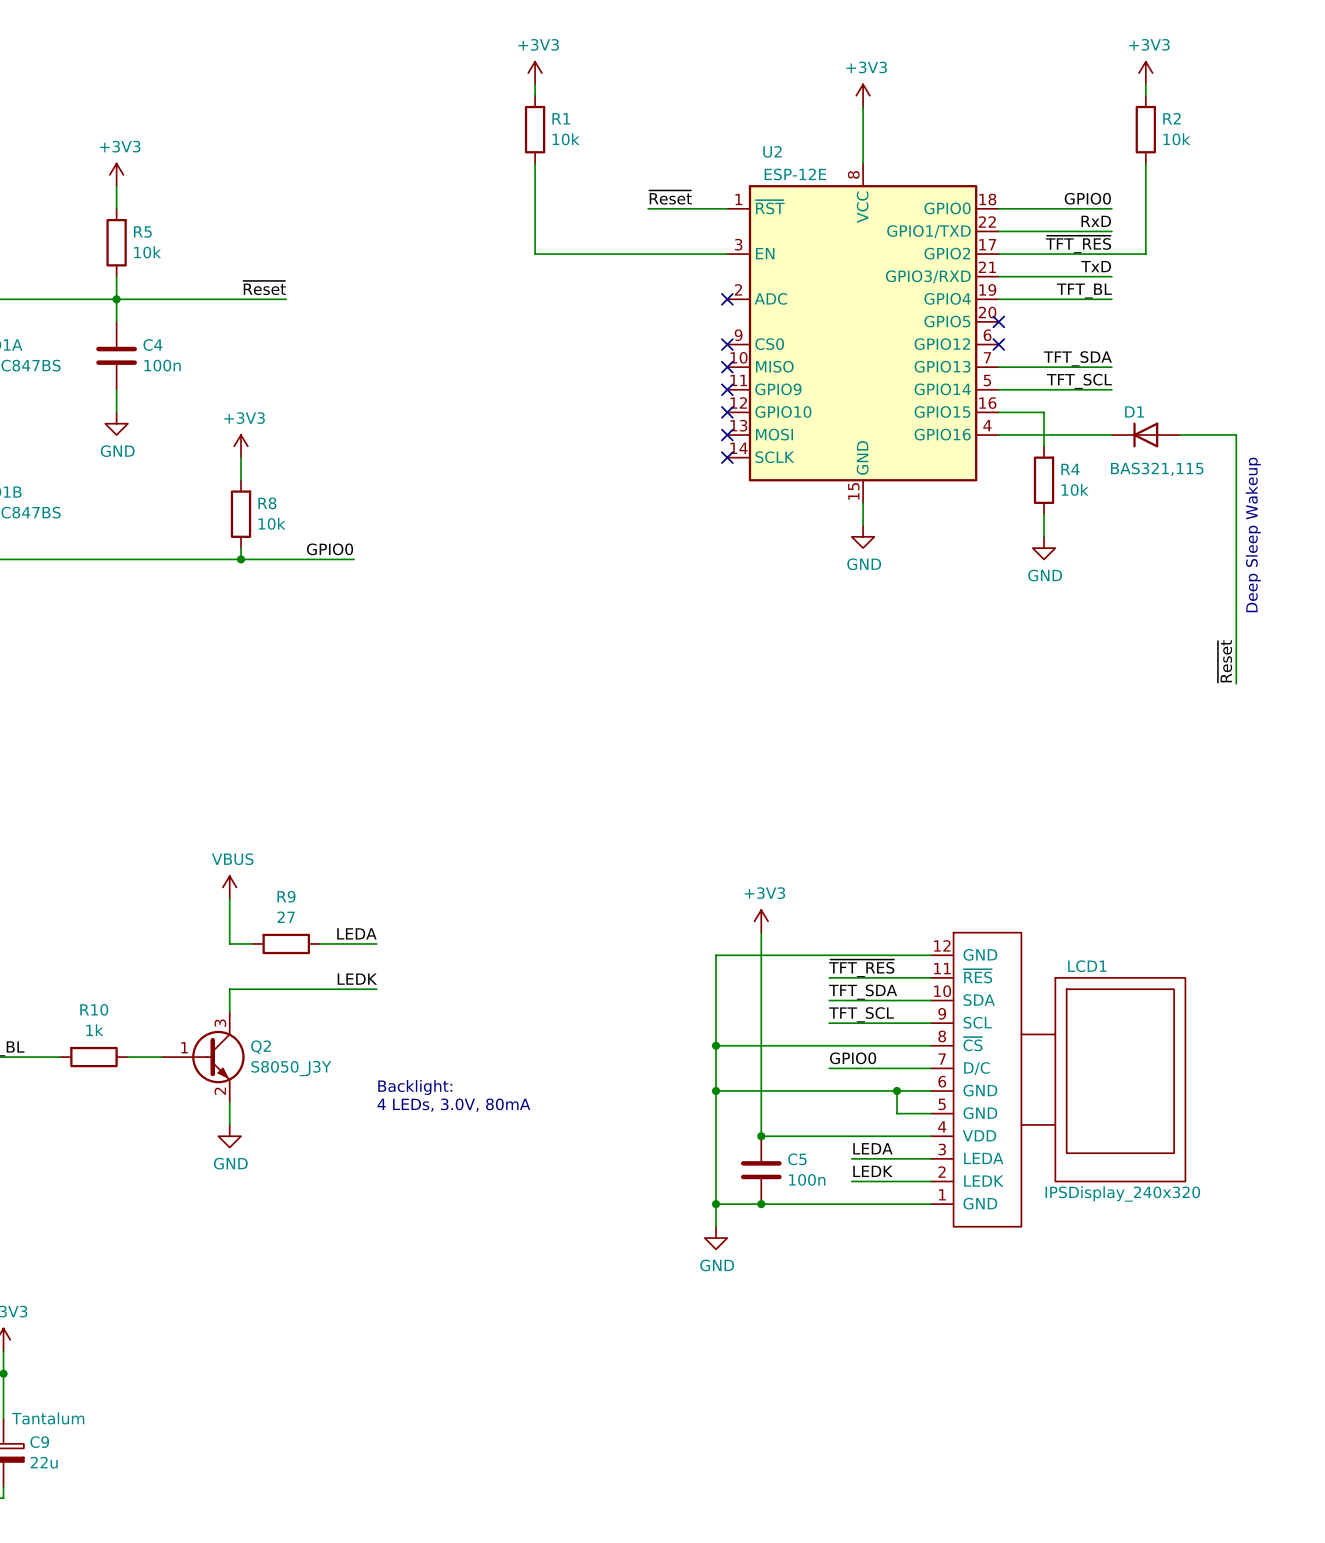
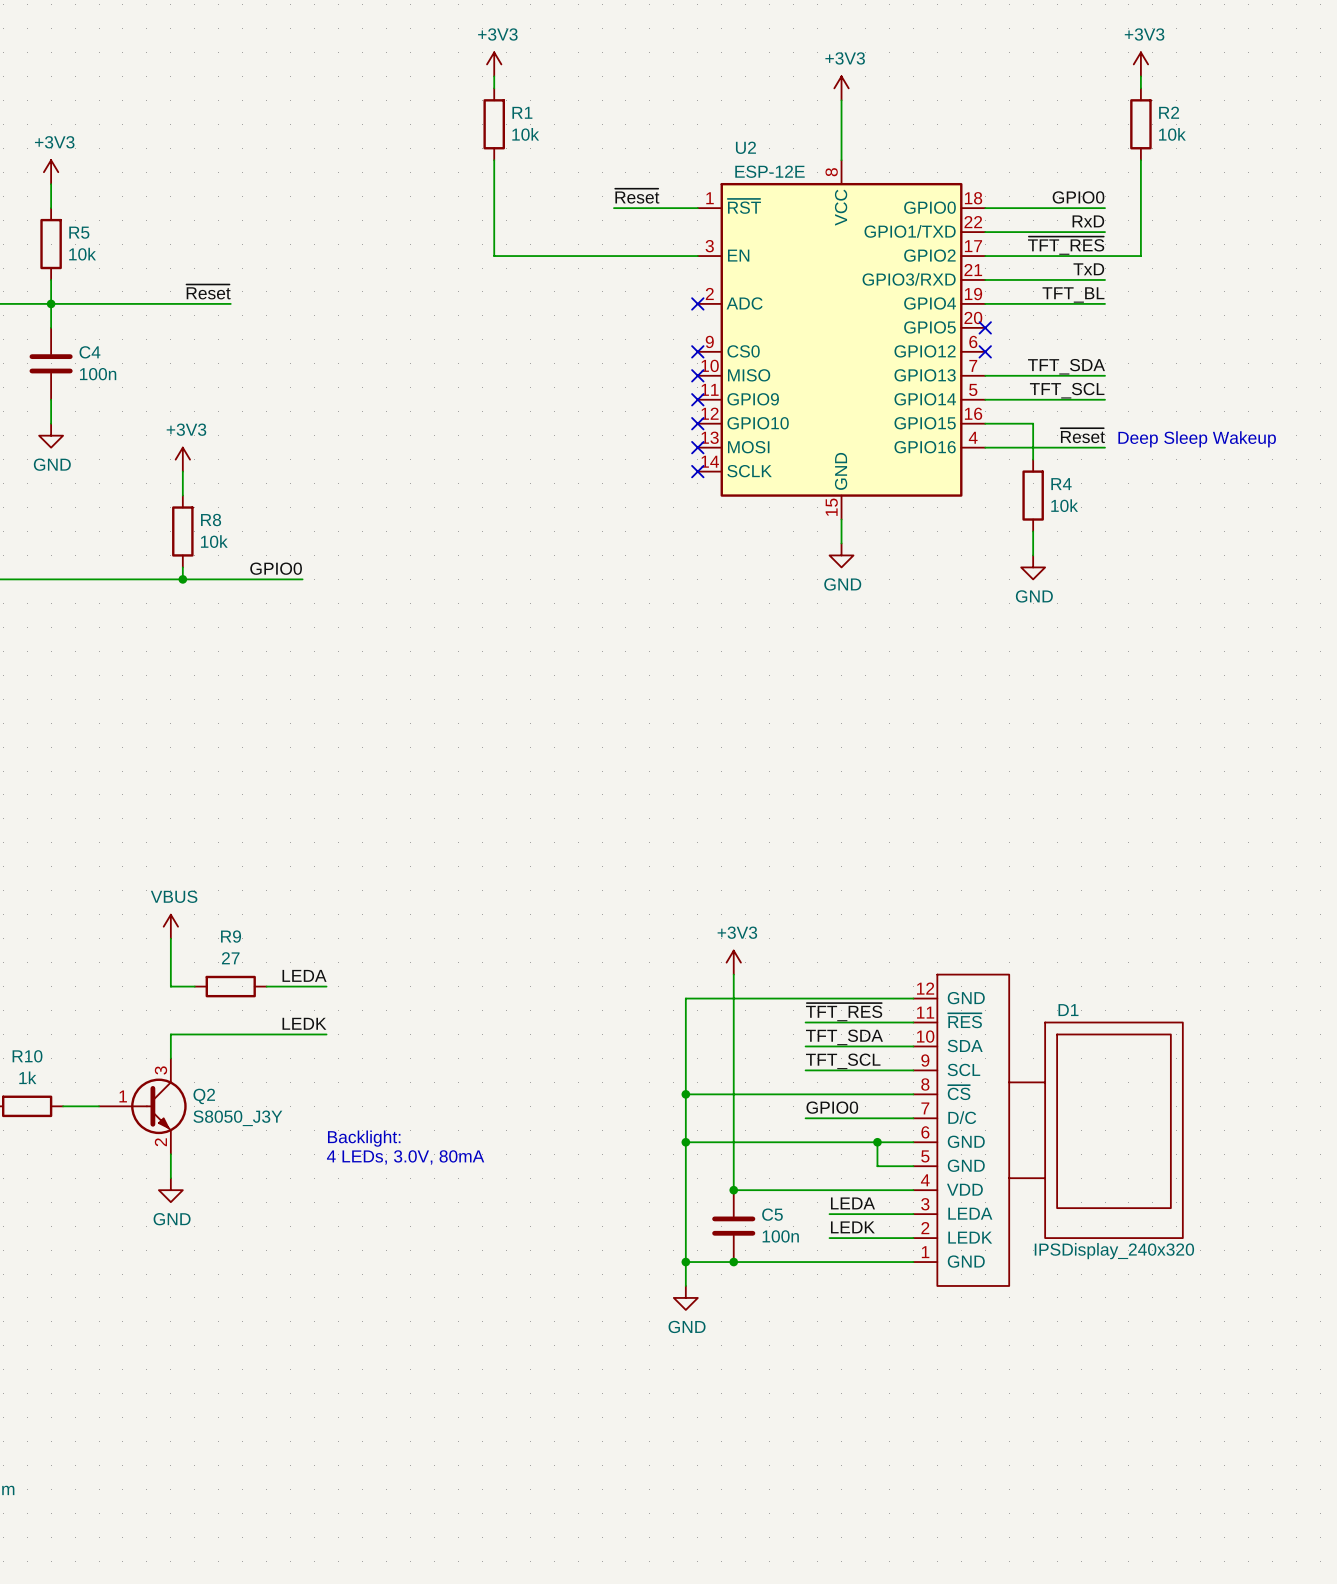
label: none -> ~{Reset} (1082, 435)
text: none -> Deep Sleep Wakeup (1197, 439)
D1: BAS321,115 (1145, 435) -> none
wire: (1179, 435) (1236, 435) (1236, 683) -> none
text: Deep Sleep Wakeup (1253, 534) -> none
label: ~{Reset} (1225, 661) -> none
LCD1 name: LCD1 (1087, 966) -> D1 (1068, 1010)

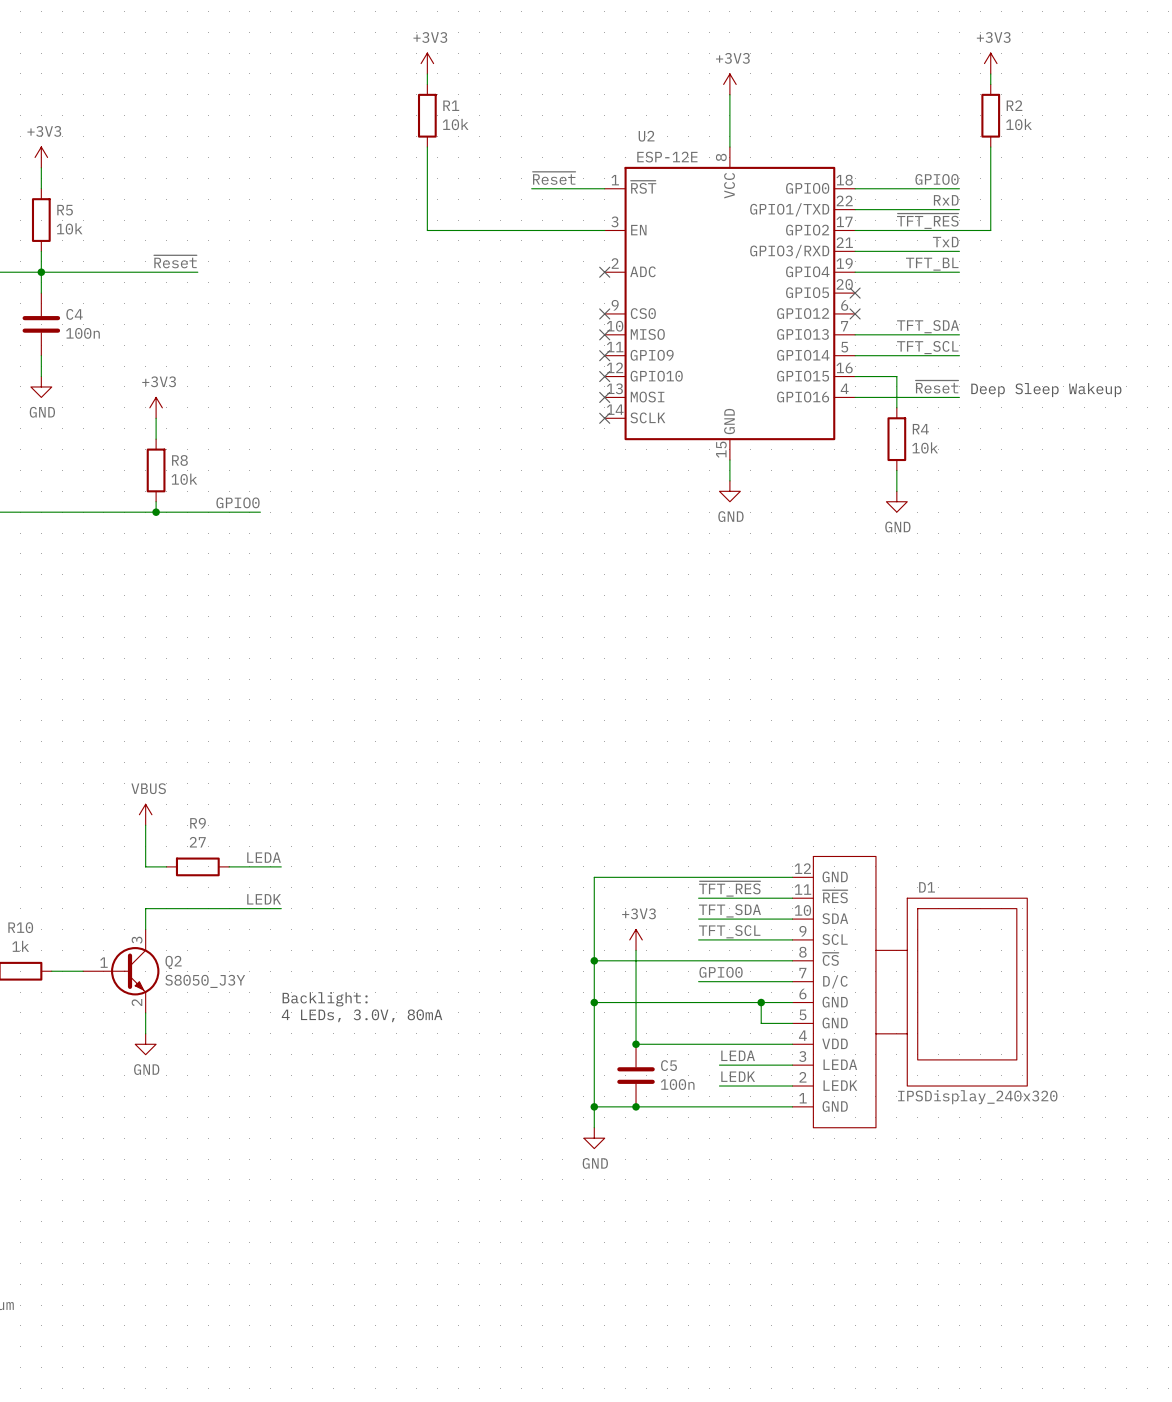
power symbol position: +3V3 (733, 962) -> +3V3 (636, 939)
wire: (733, 974) (733, 1082) -> none

